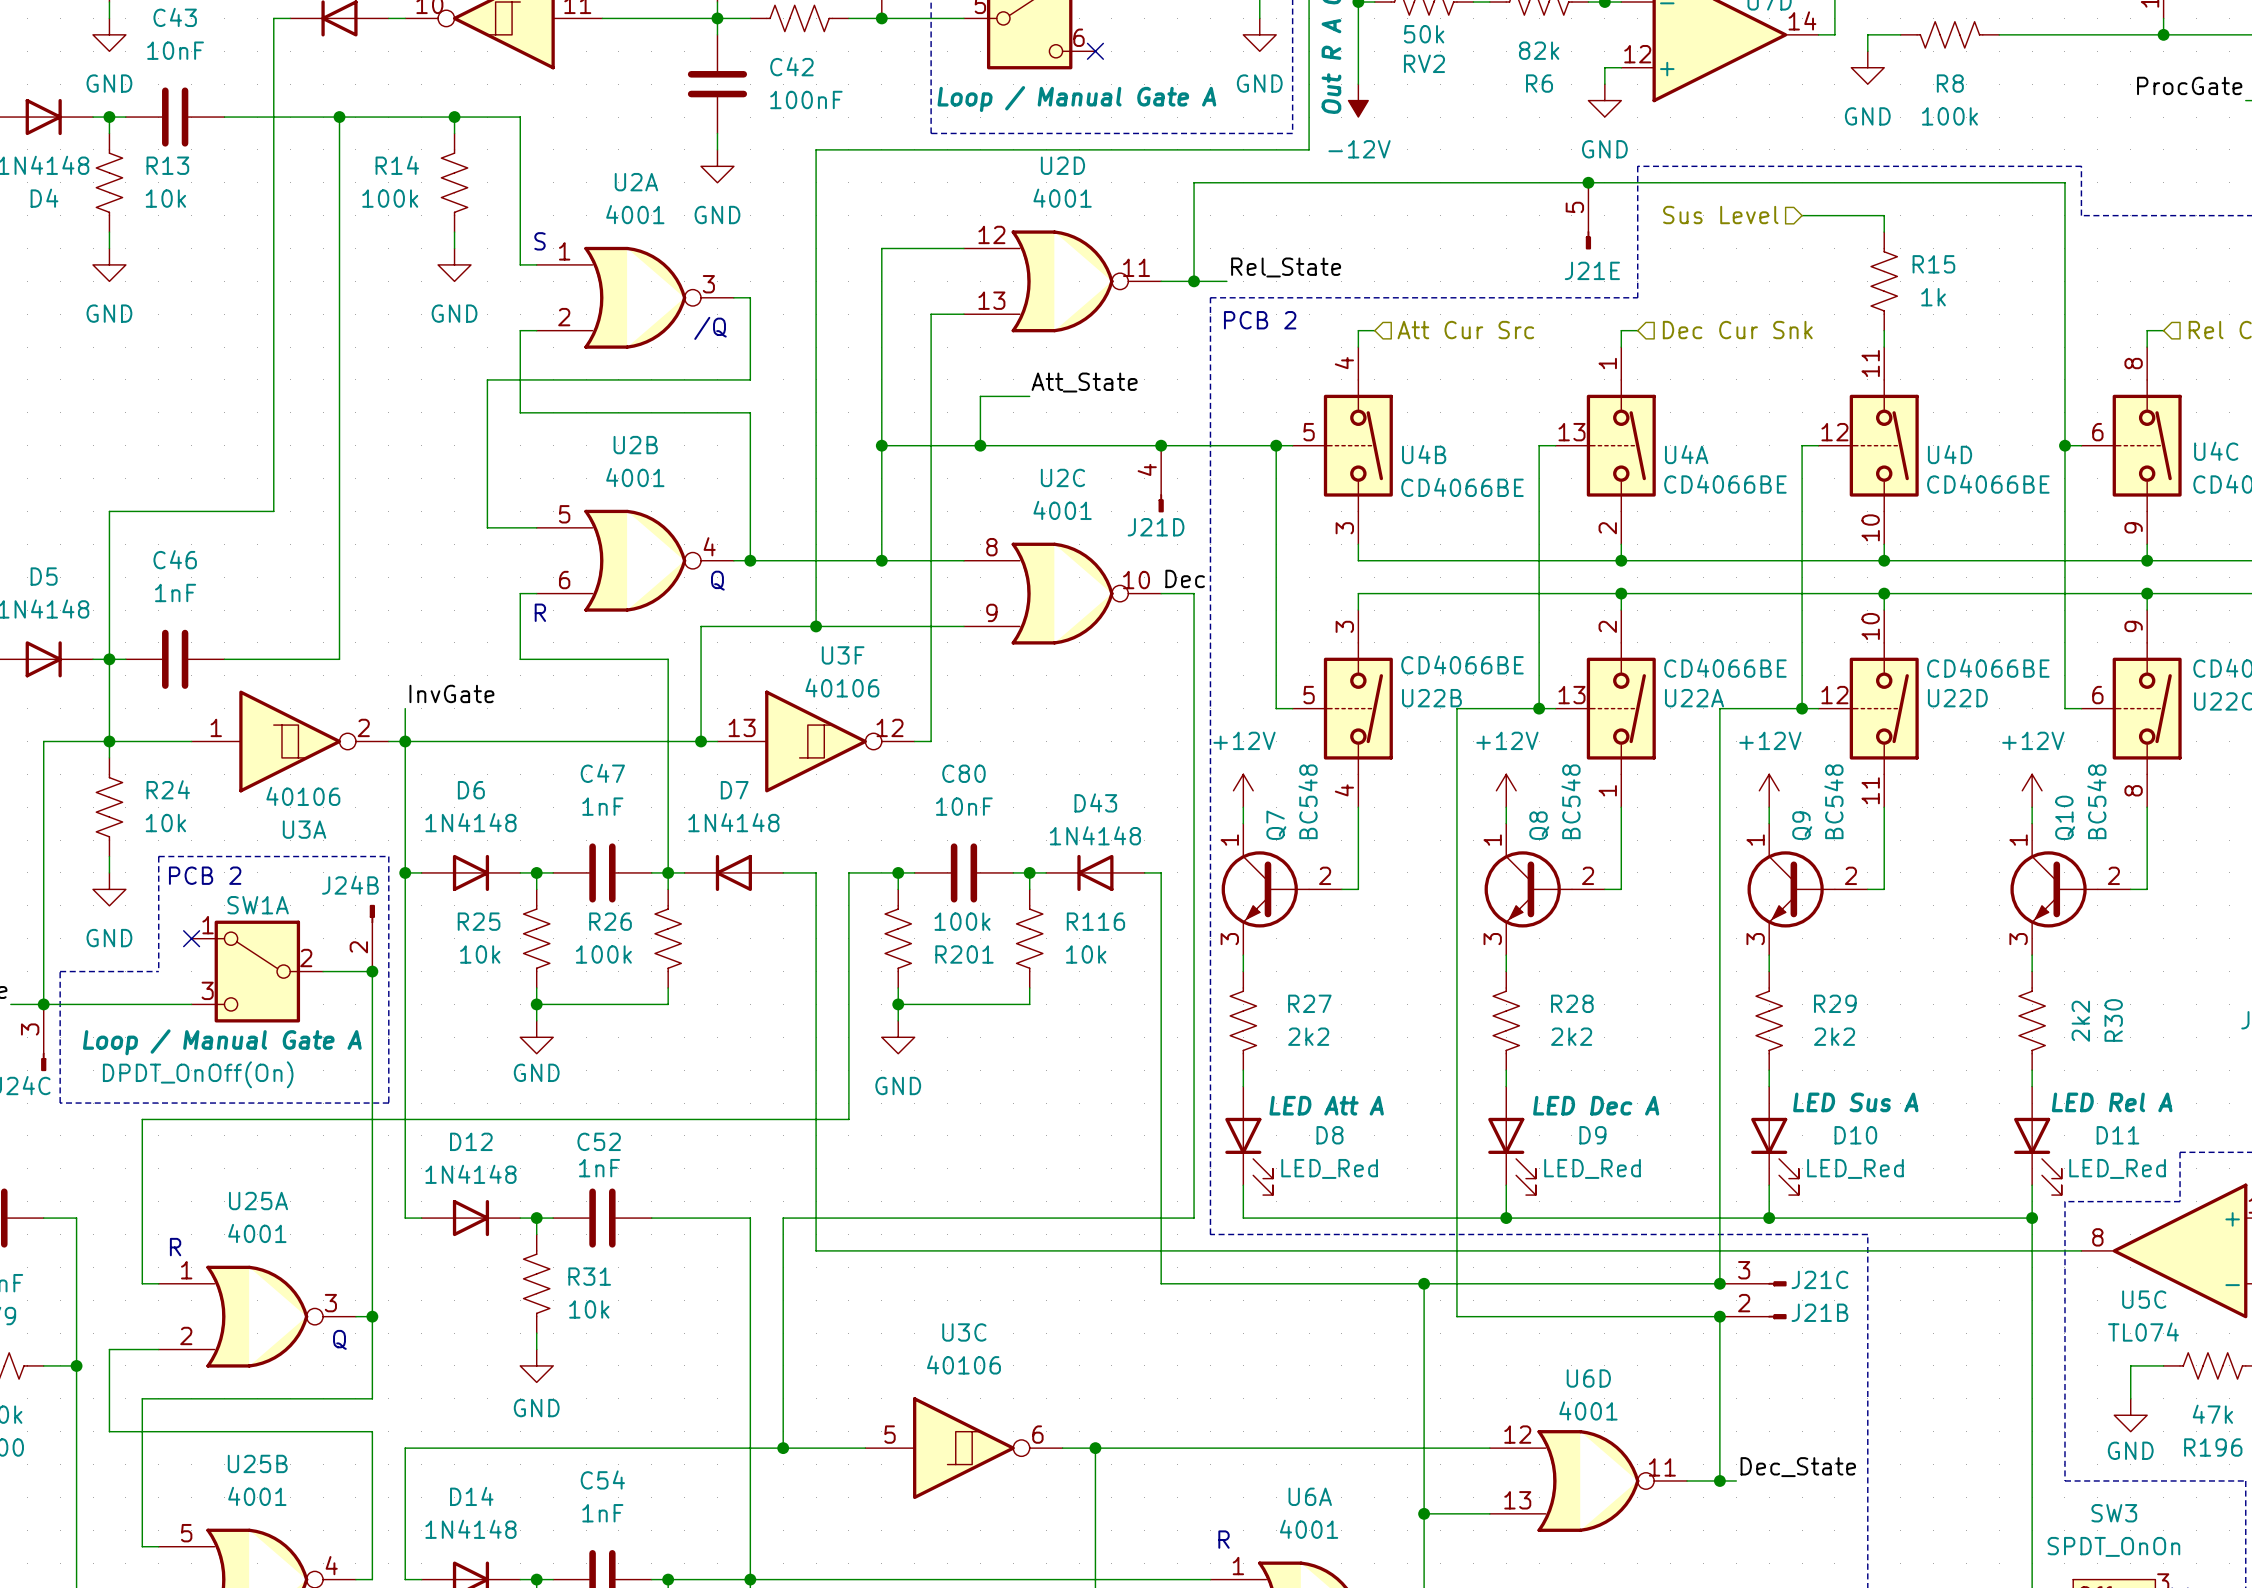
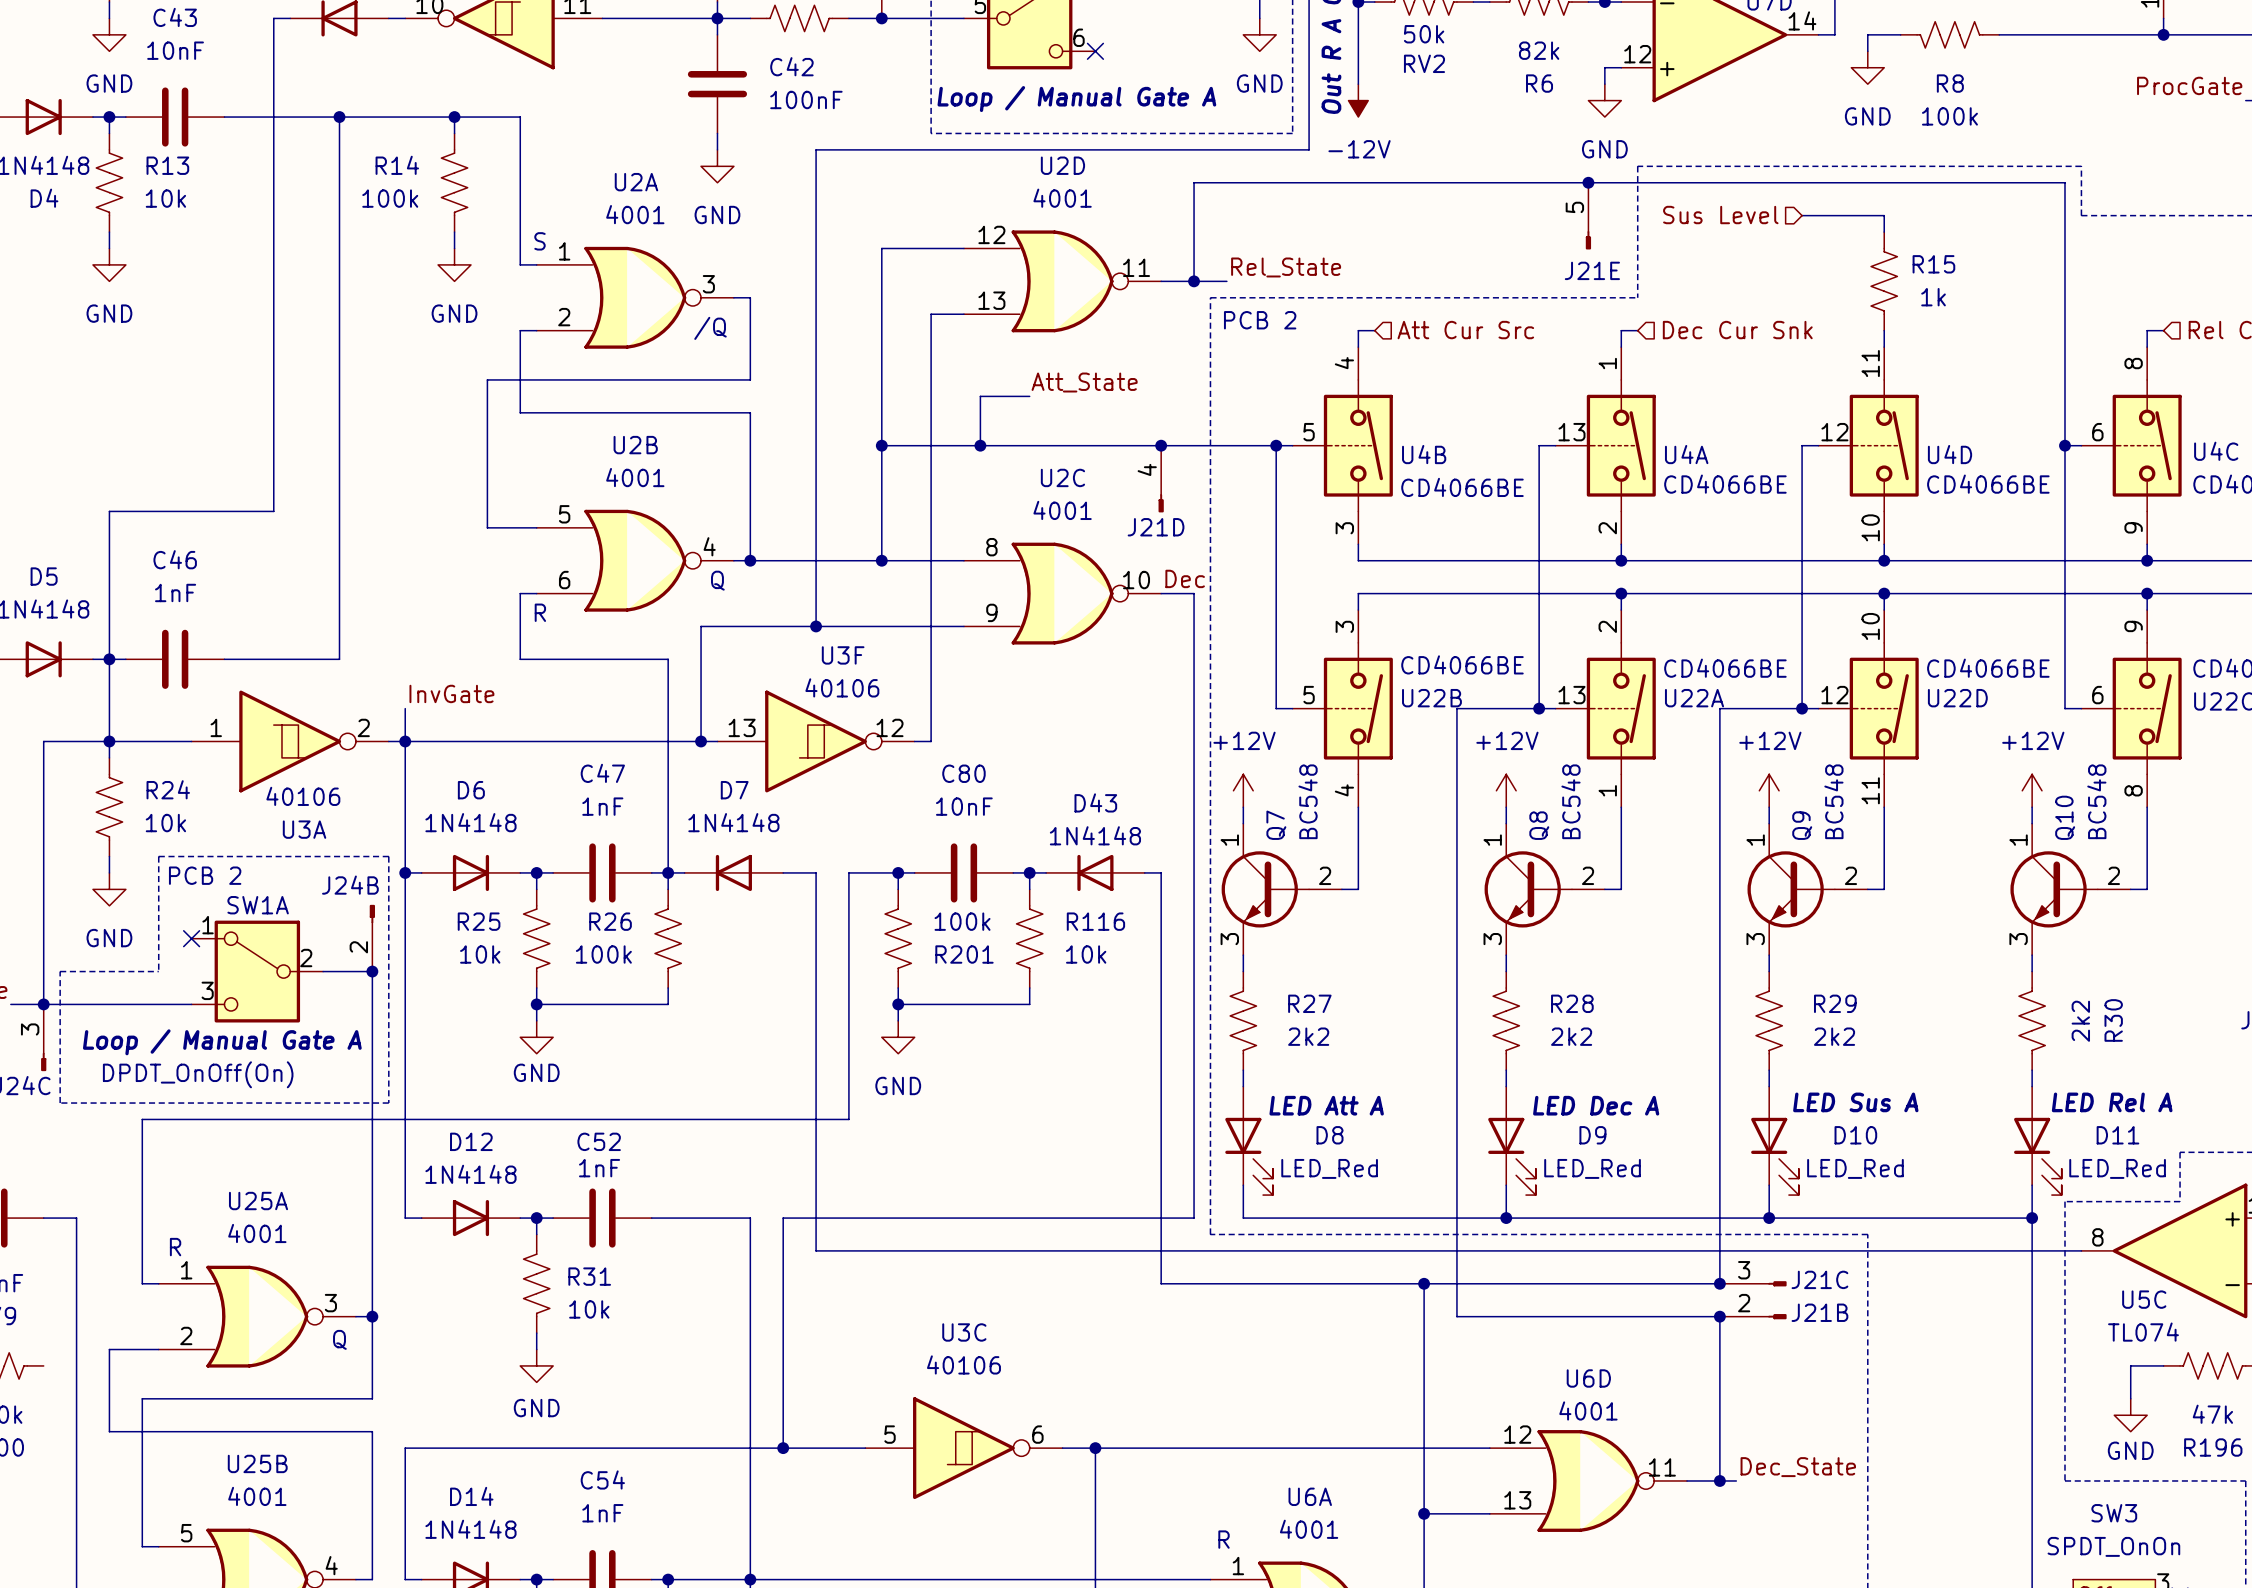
wire: (43, 1365) (76, 1365) -> none
junction: (76, 1365) -> none

